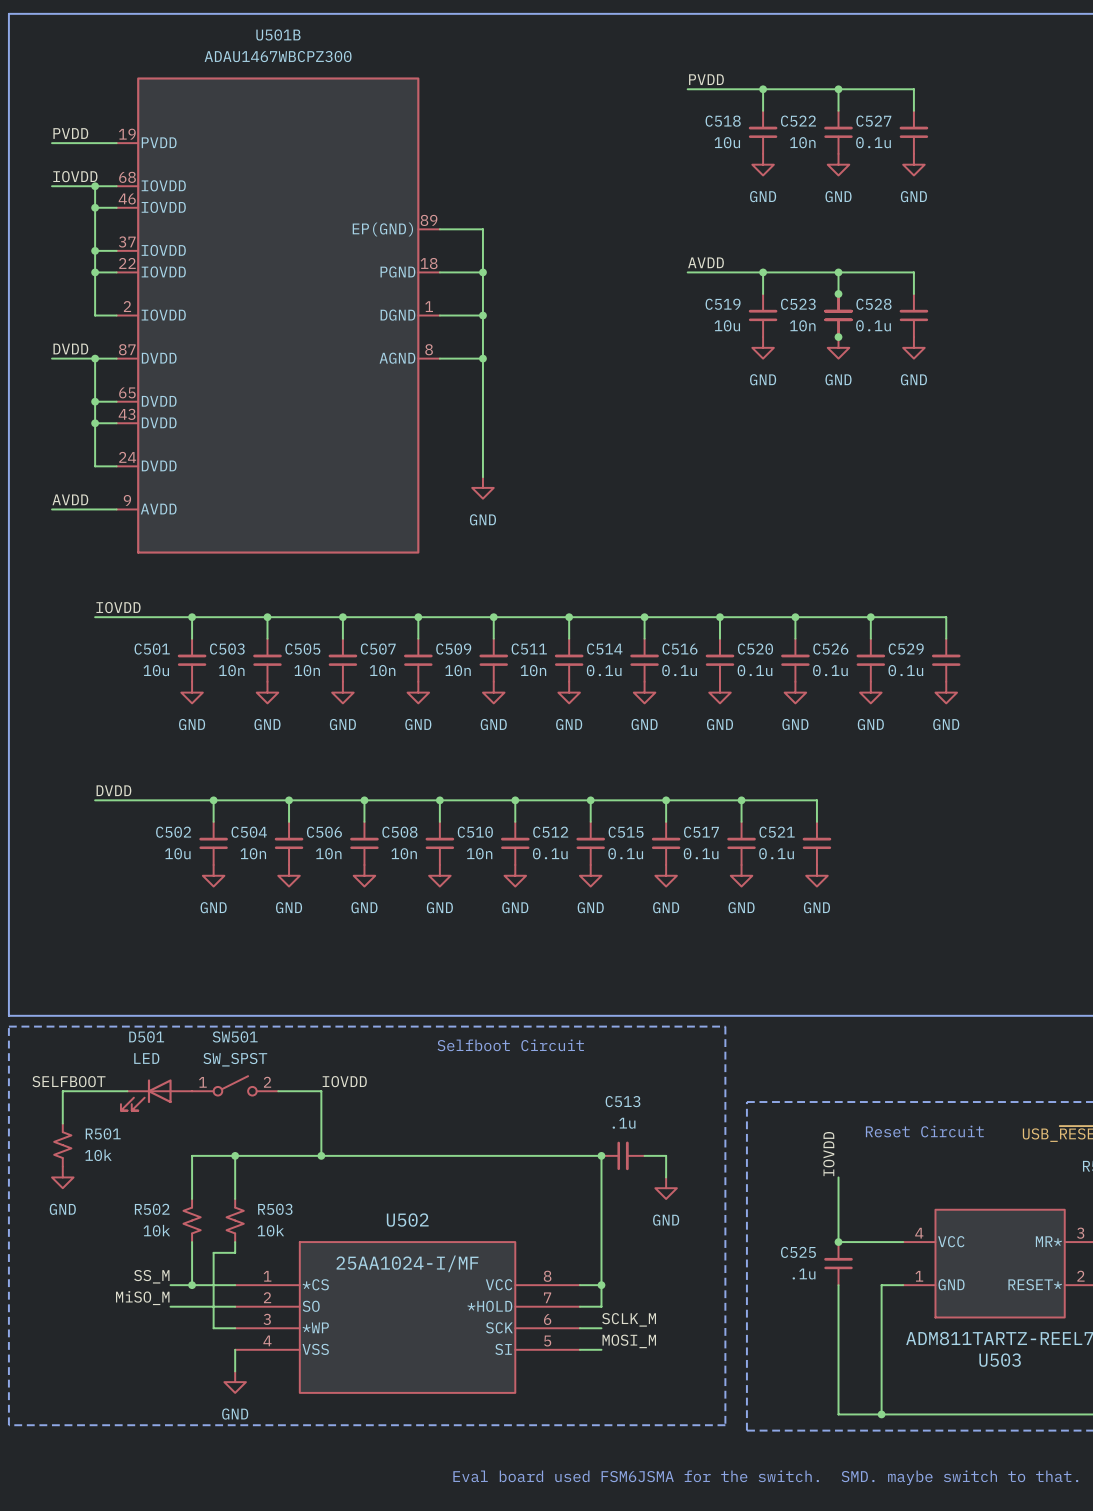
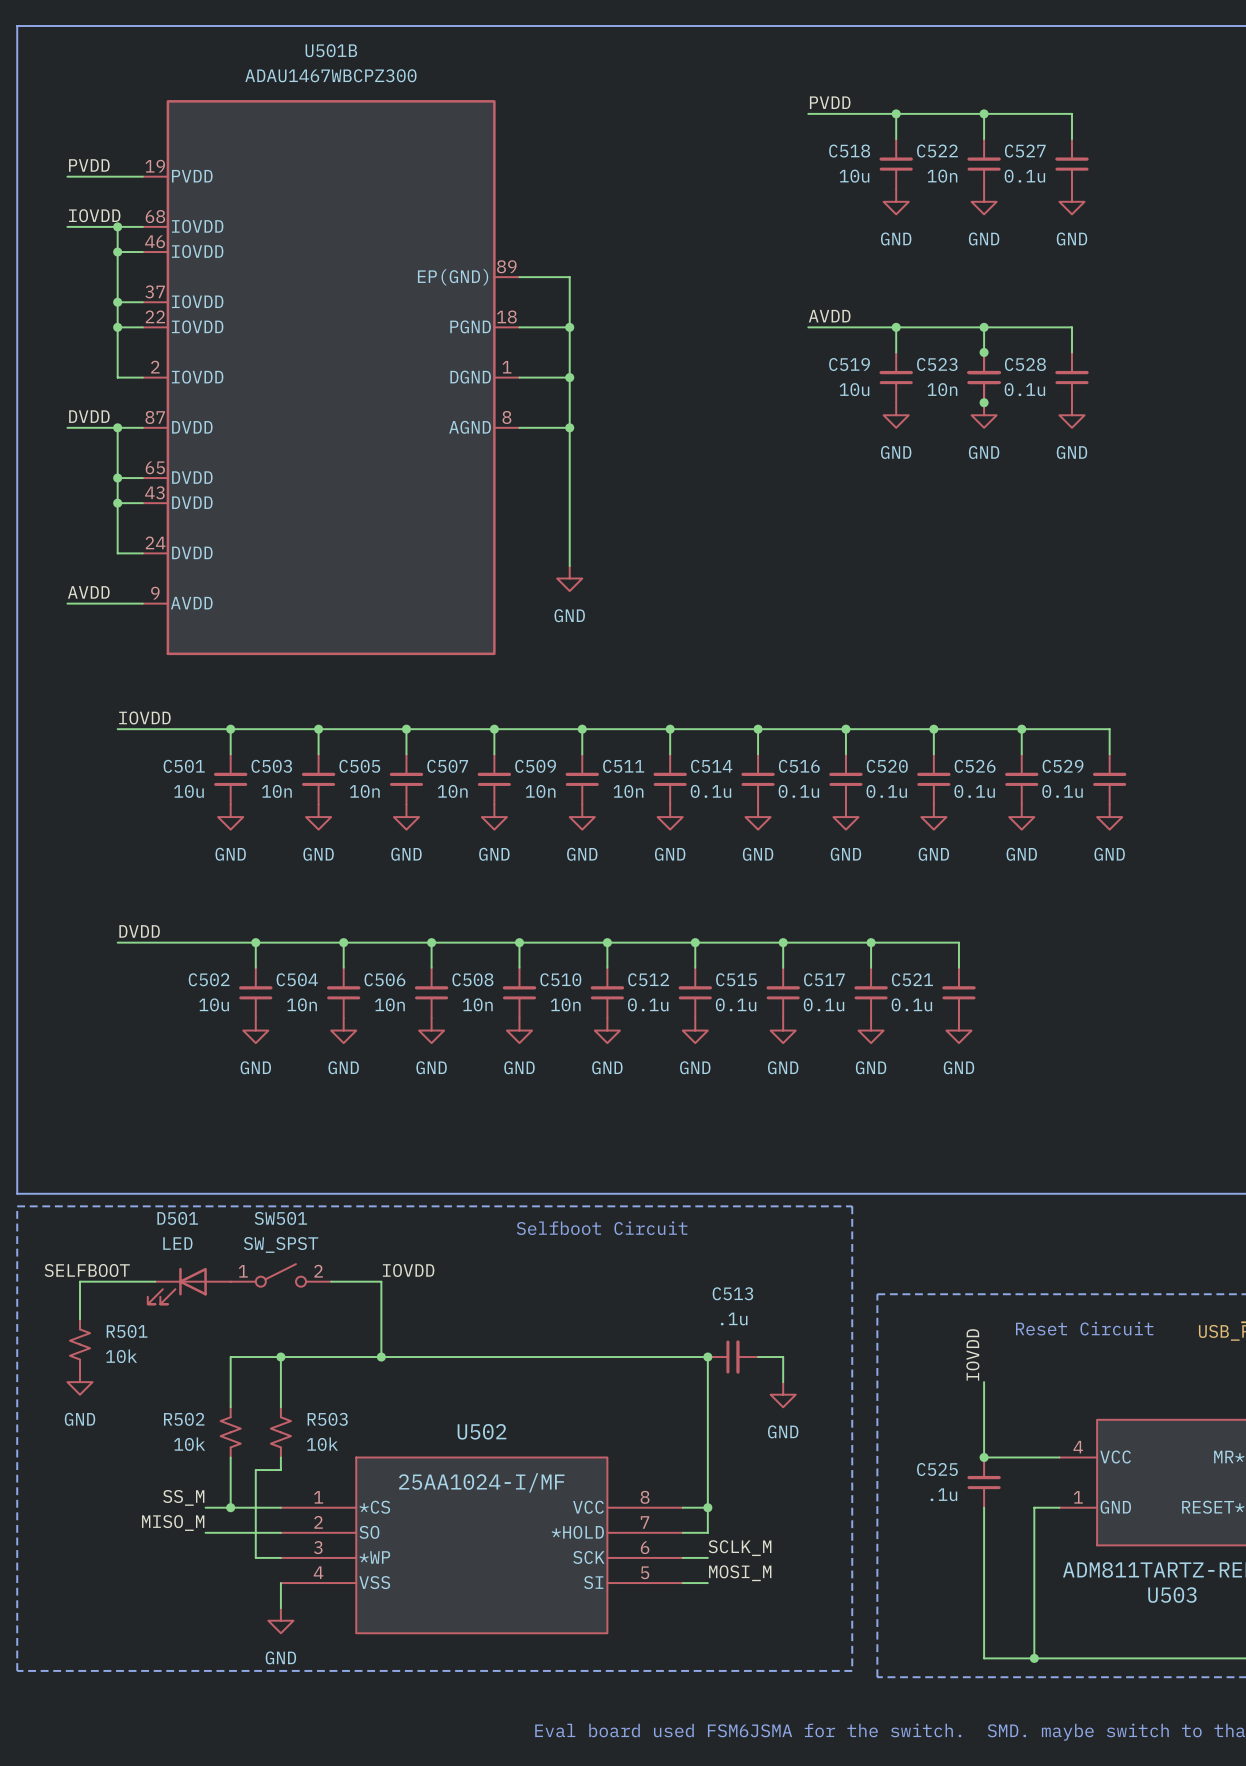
label: MiSO_M (142, 1298) -> MISO_M (173, 1523)

